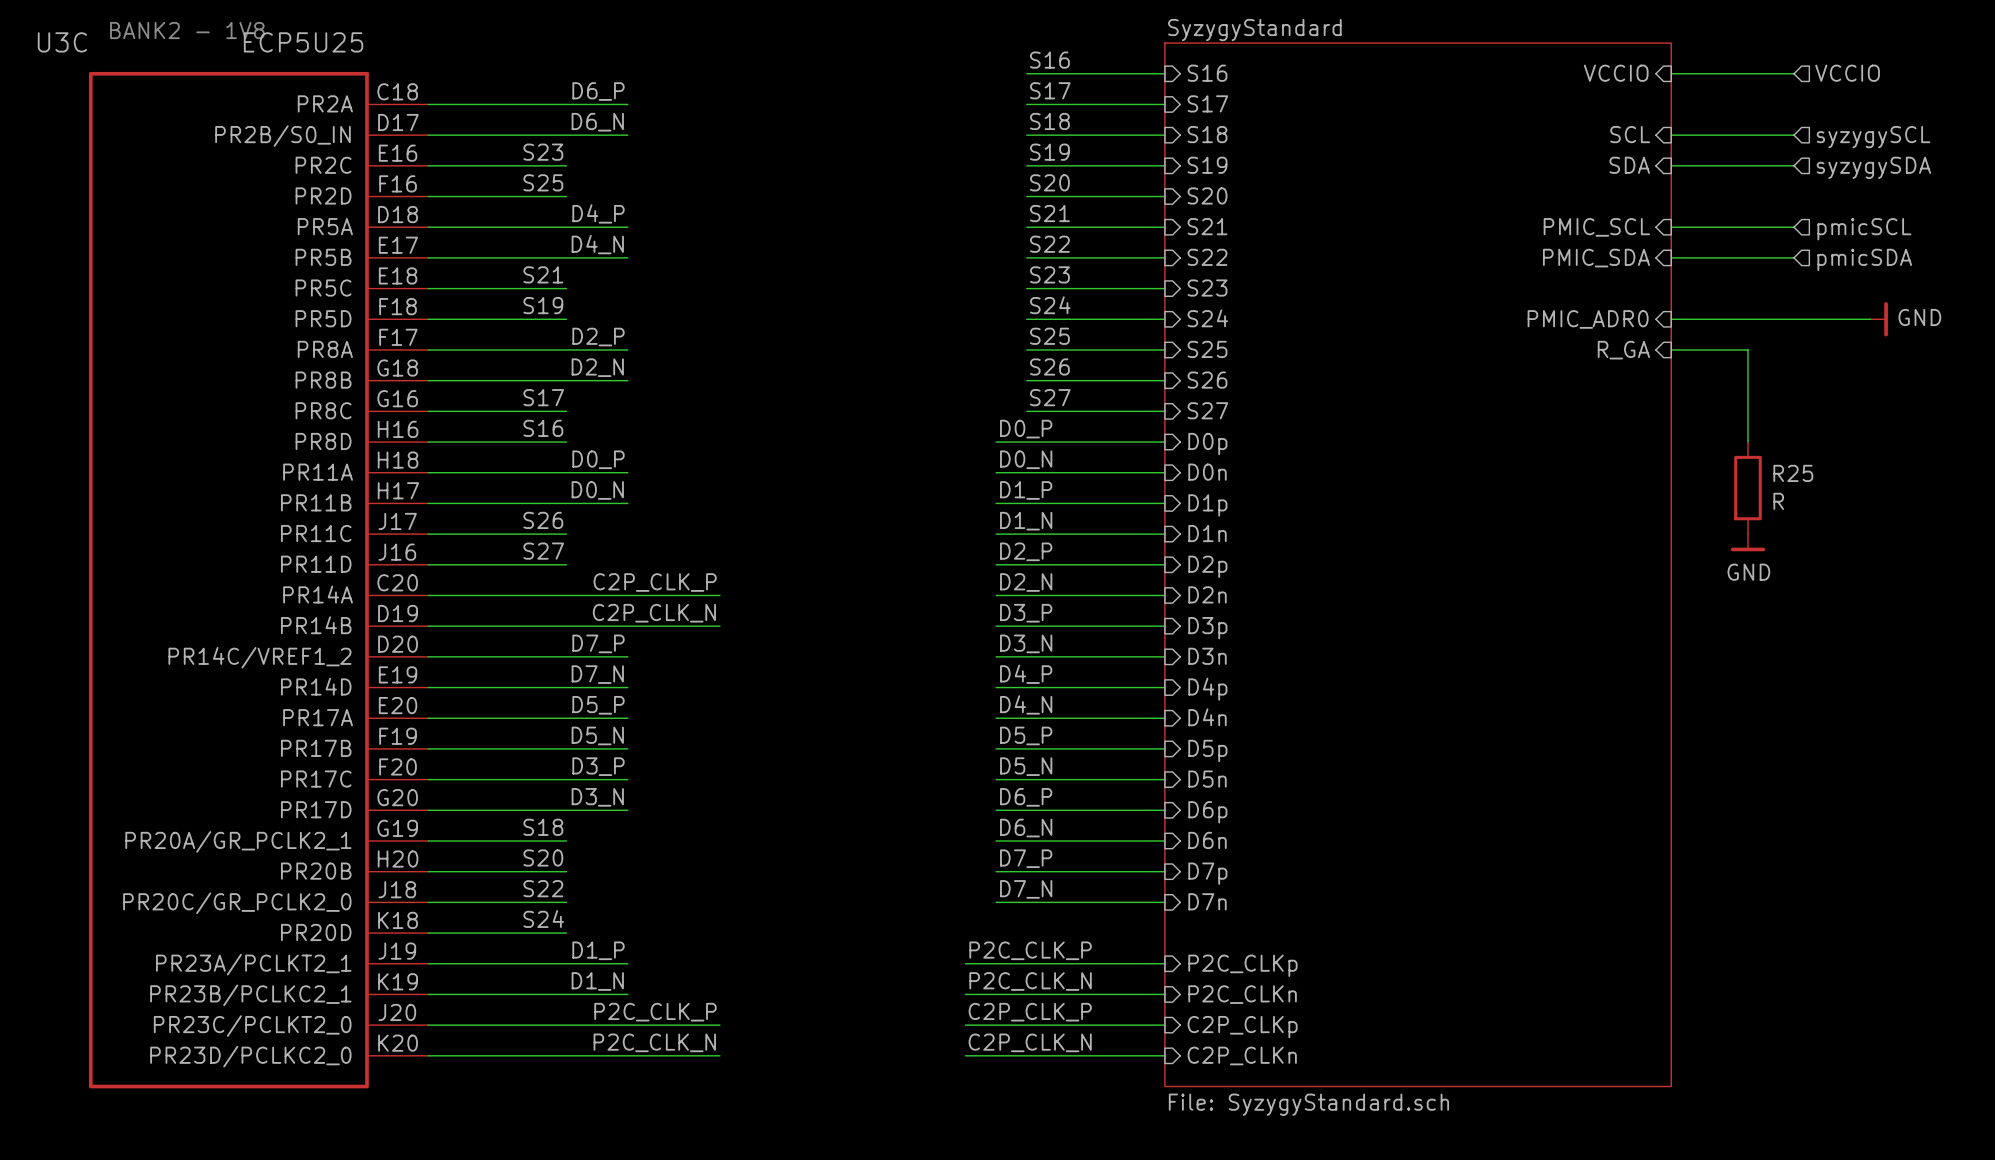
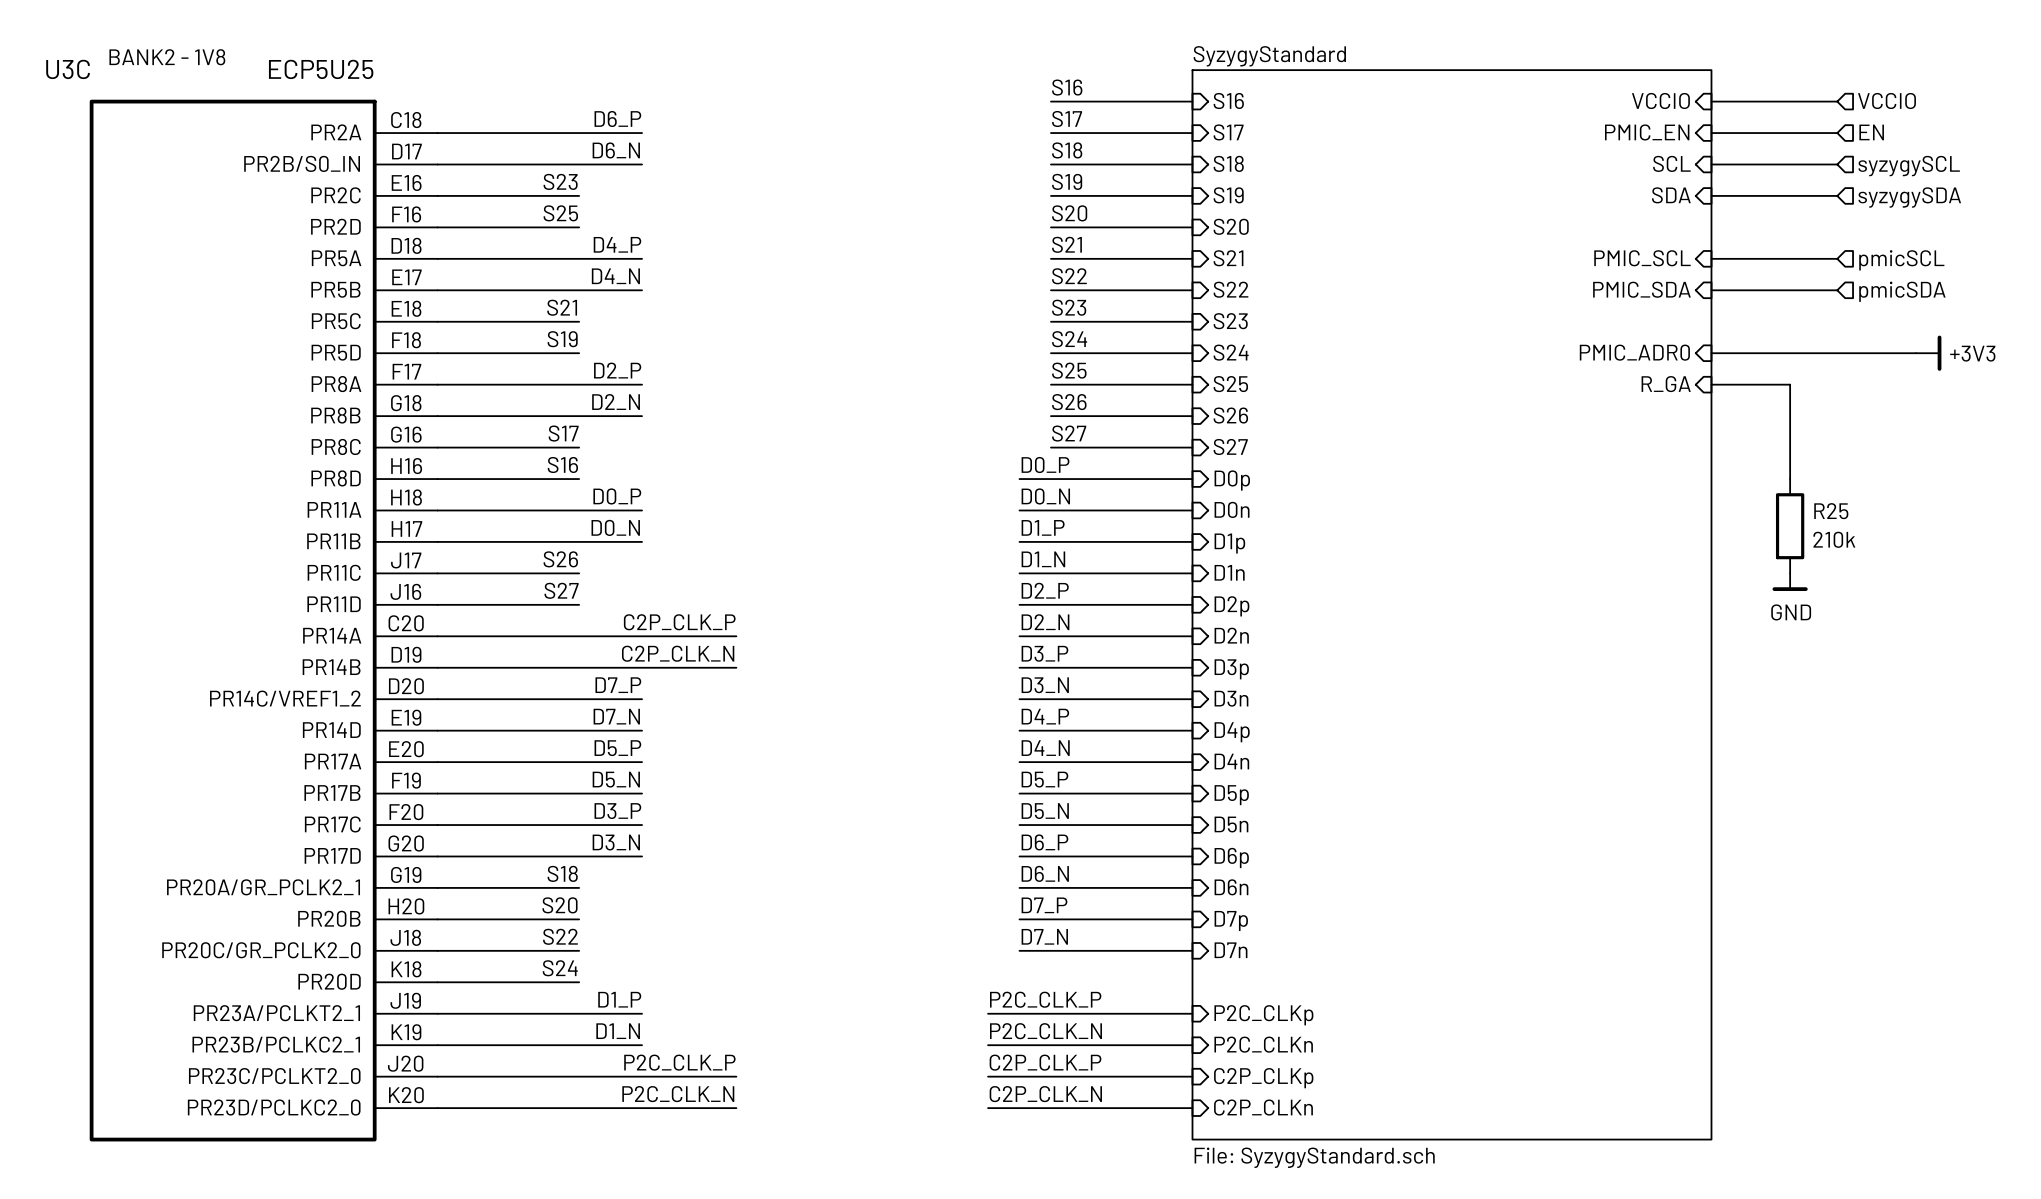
hierarchical label: none -> EN (1871, 132)
sheet pin: none -> PMIC_EN (1647, 132)
wire: none -> (1711, 133) (1837, 133)
power symbol: GND (1879, 319) -> +3V3 (1928, 353)
R25 value: R (1778, 501) -> 210k (1834, 539)

